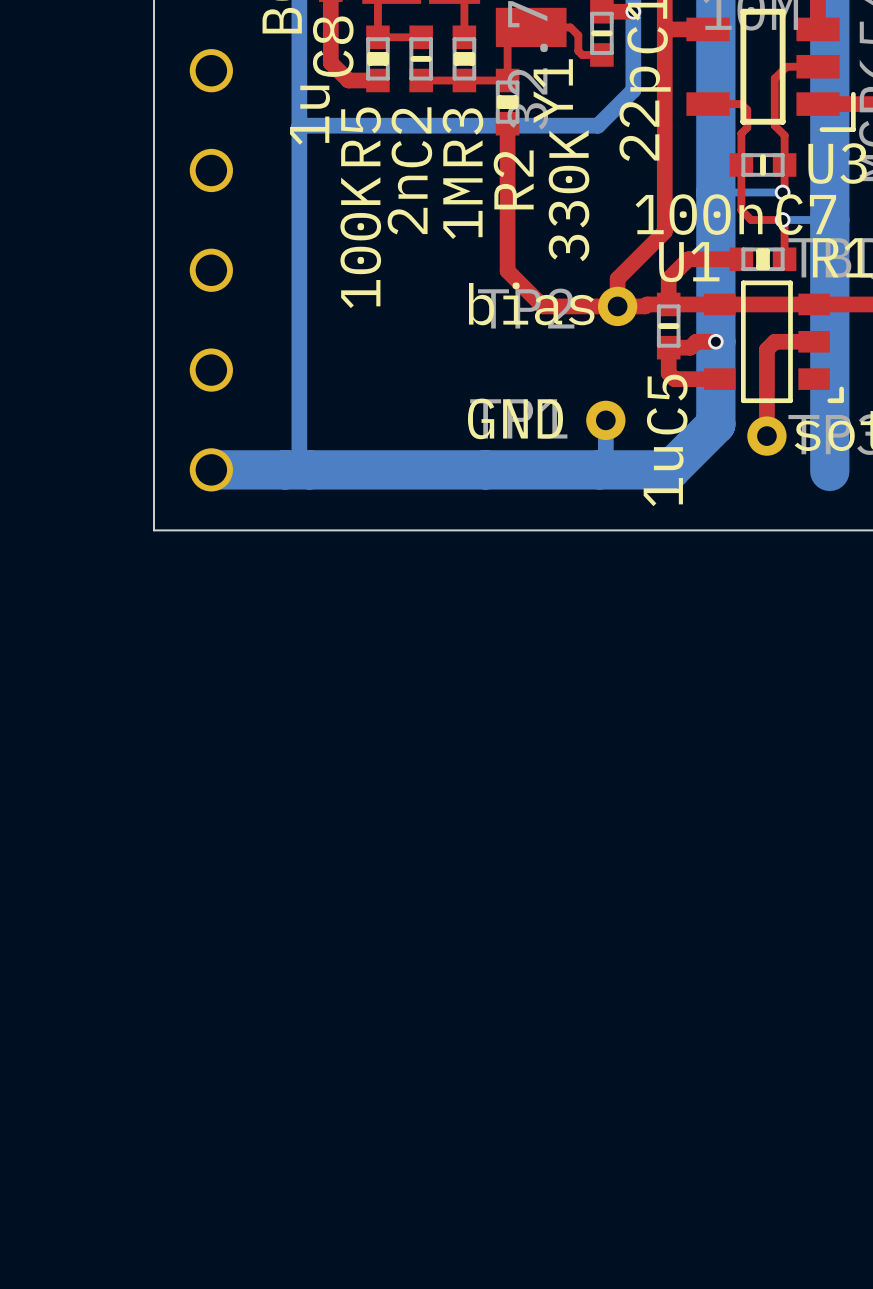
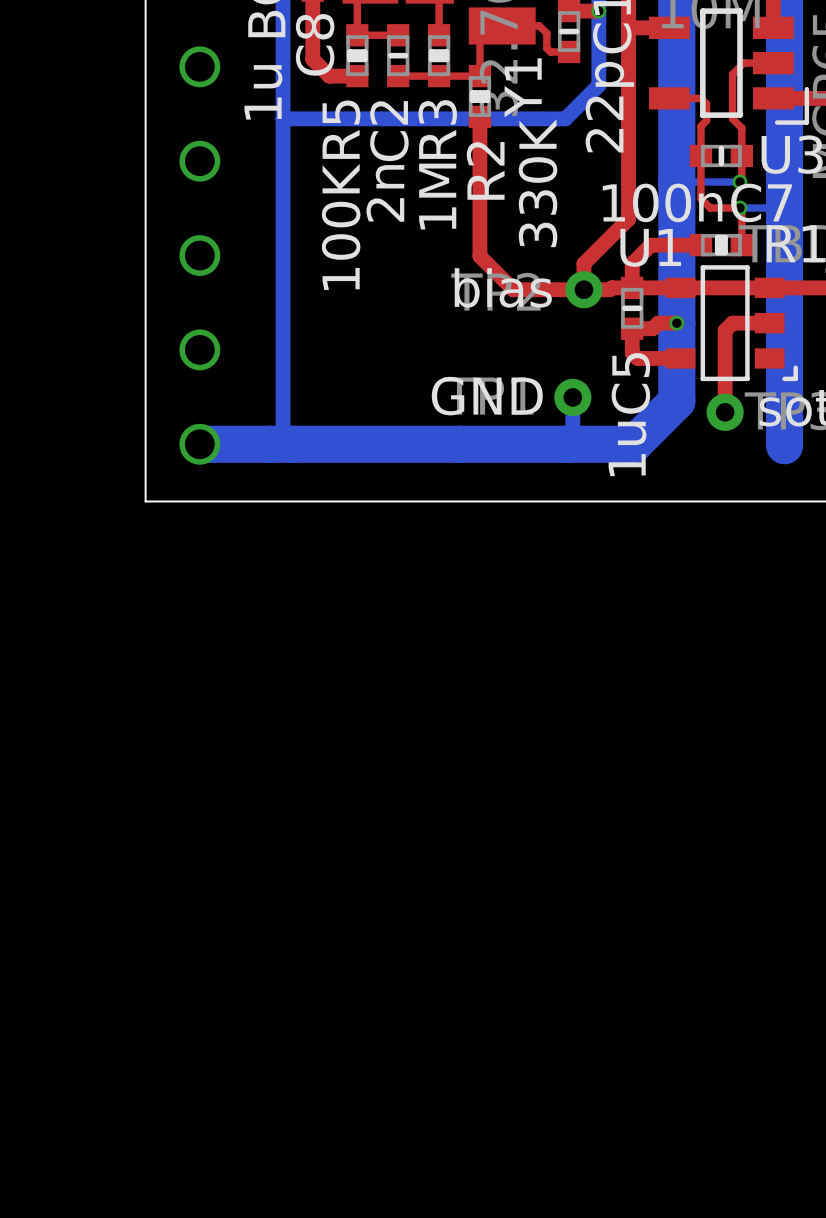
C8 value position: 1u (310, 115) -> 1u (263, 92)

